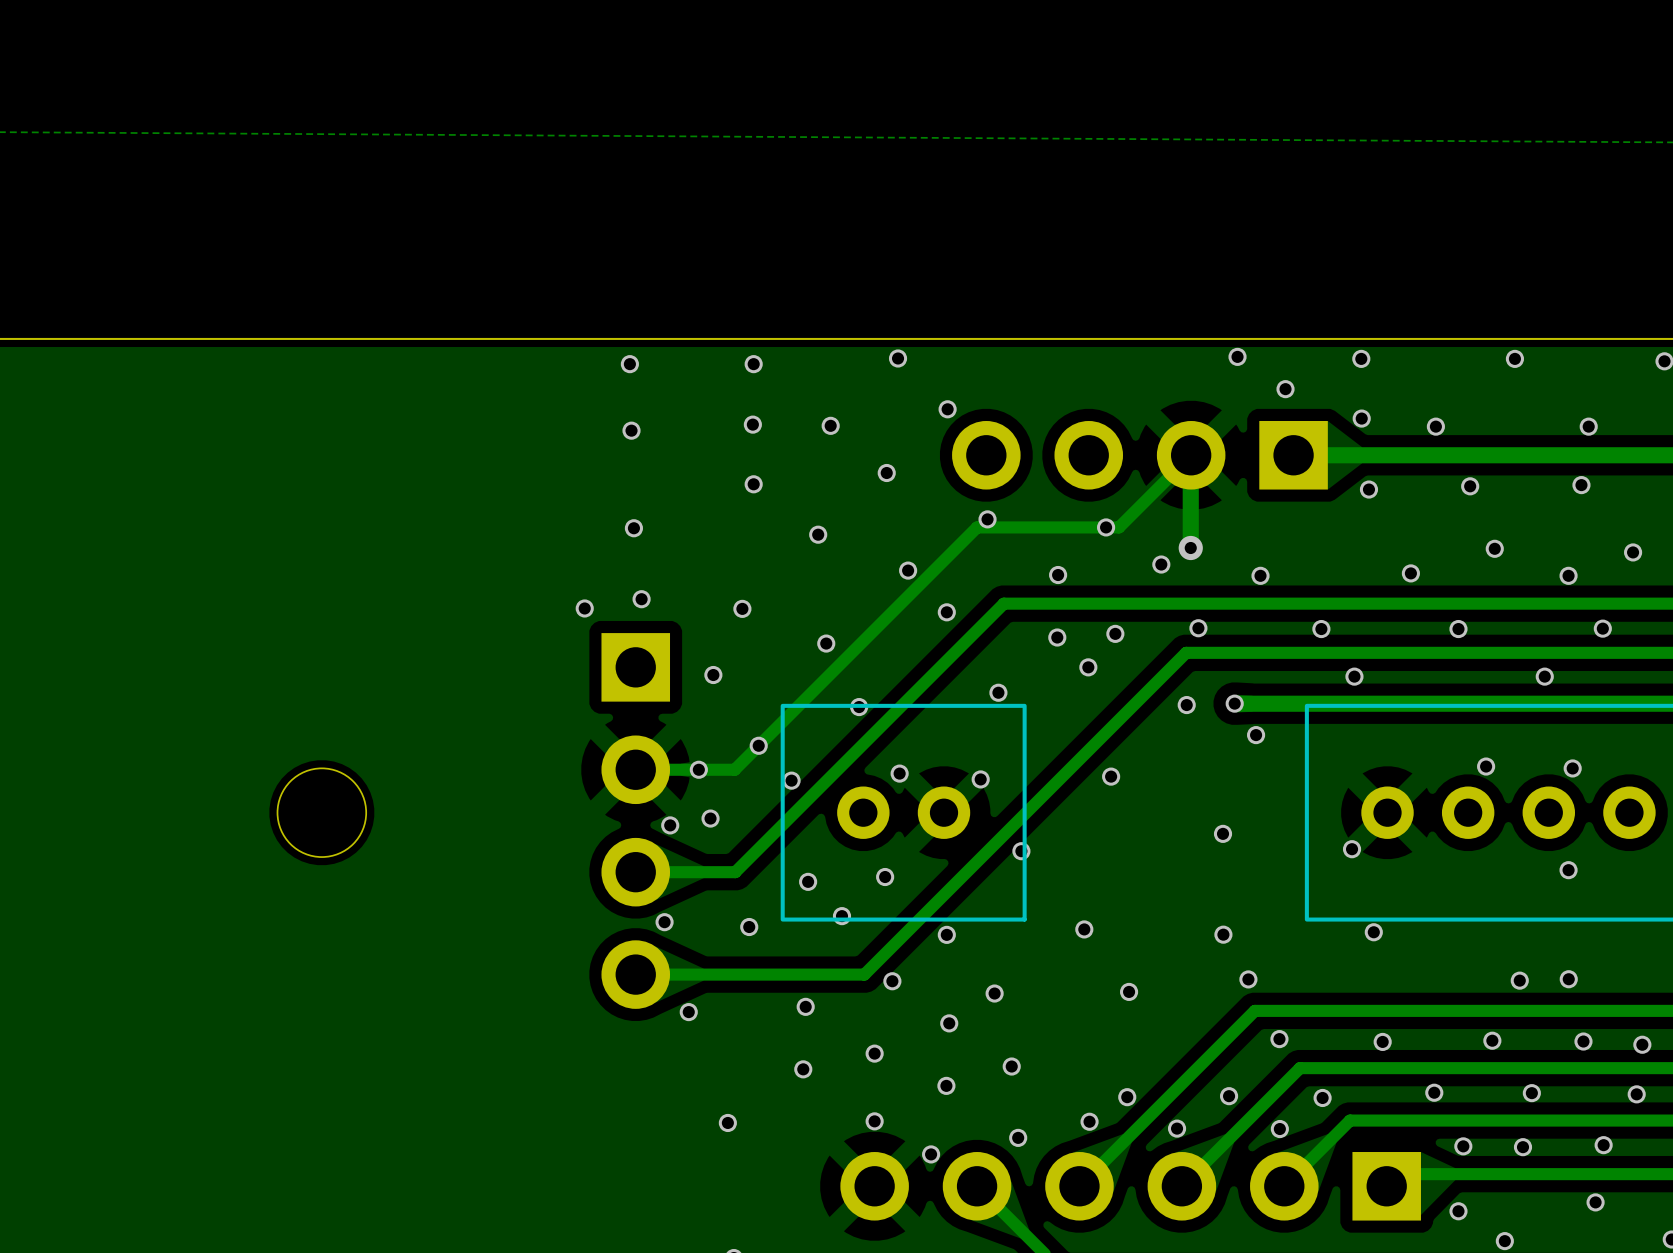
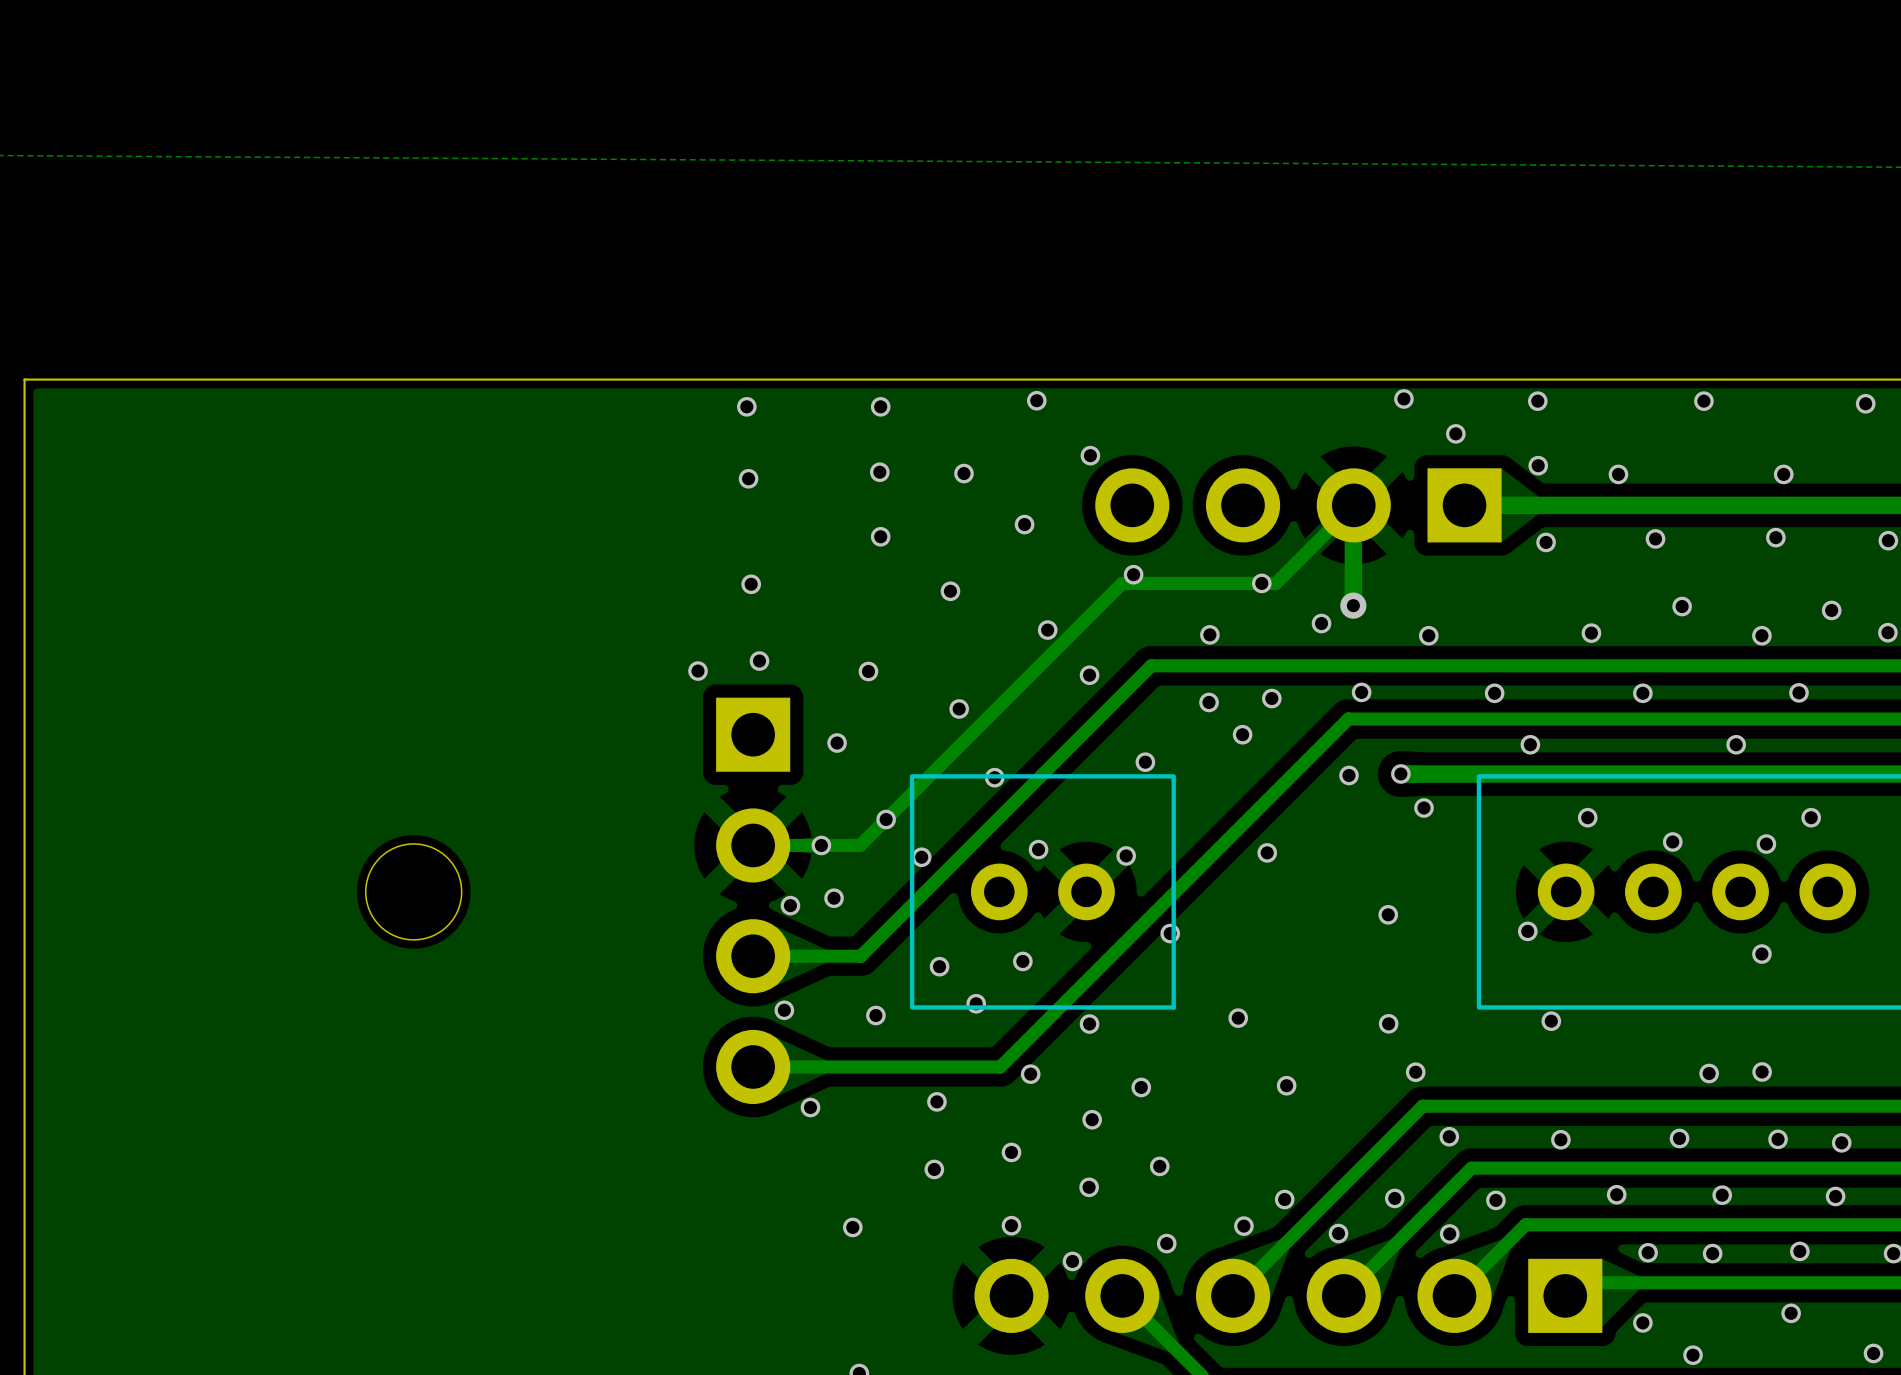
via: none -> (1587, 817)
via: none -> (1811, 817)

